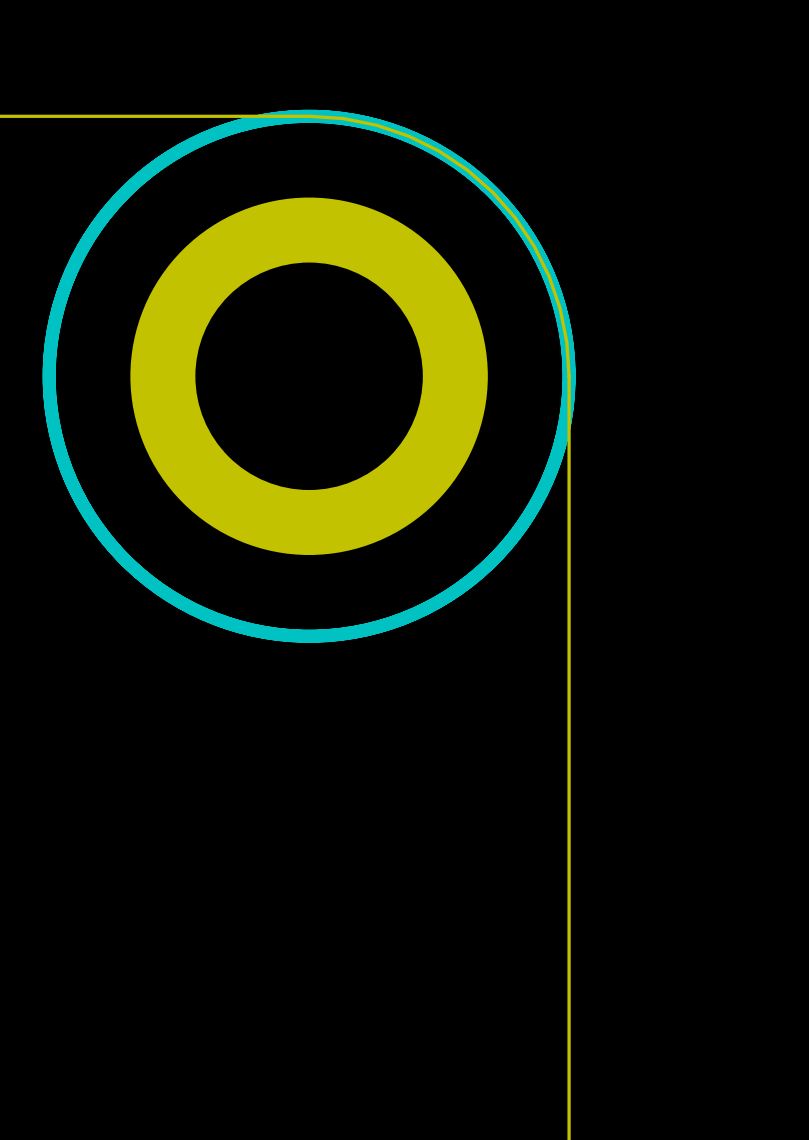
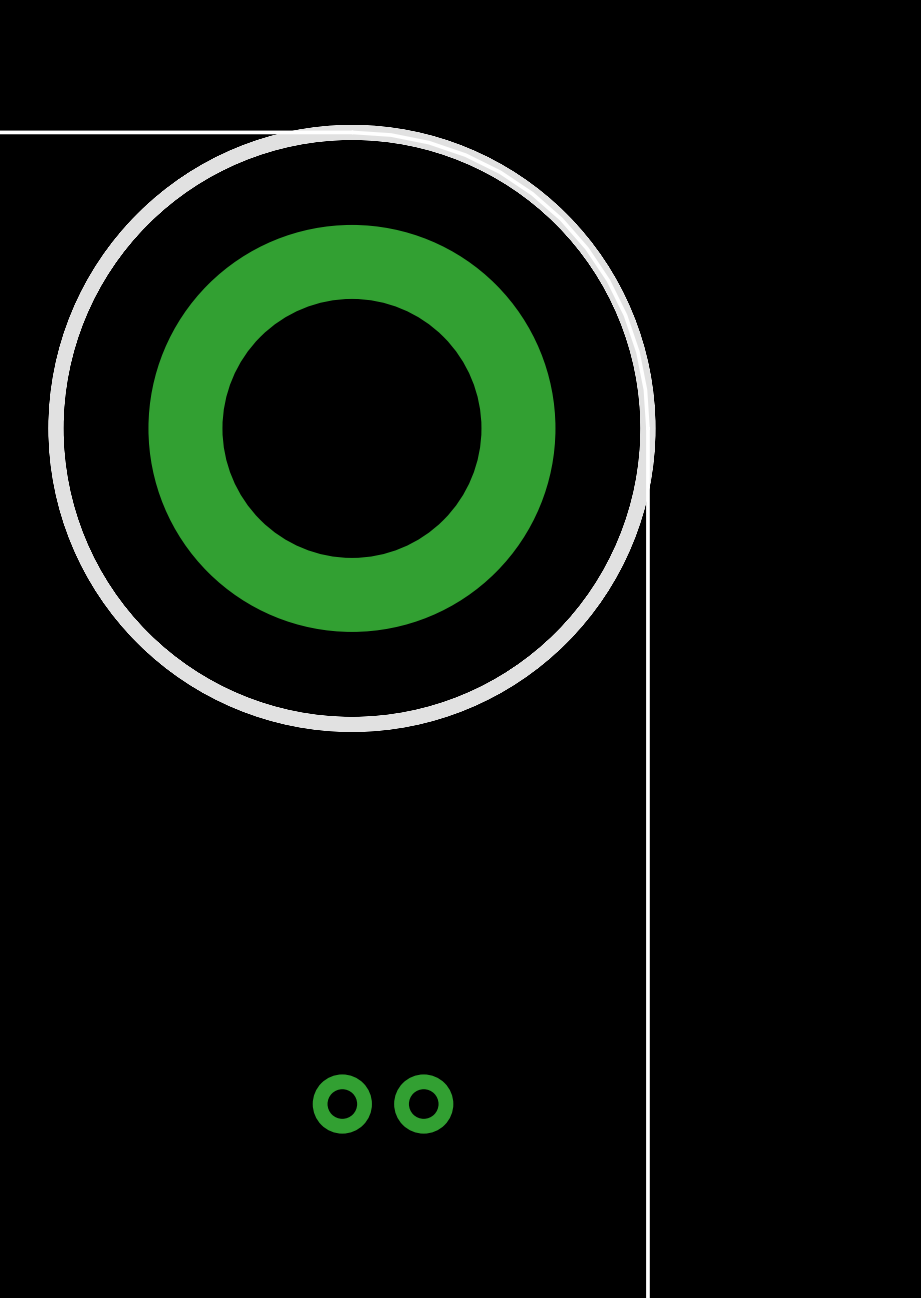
part: none -> (383, 1104)

